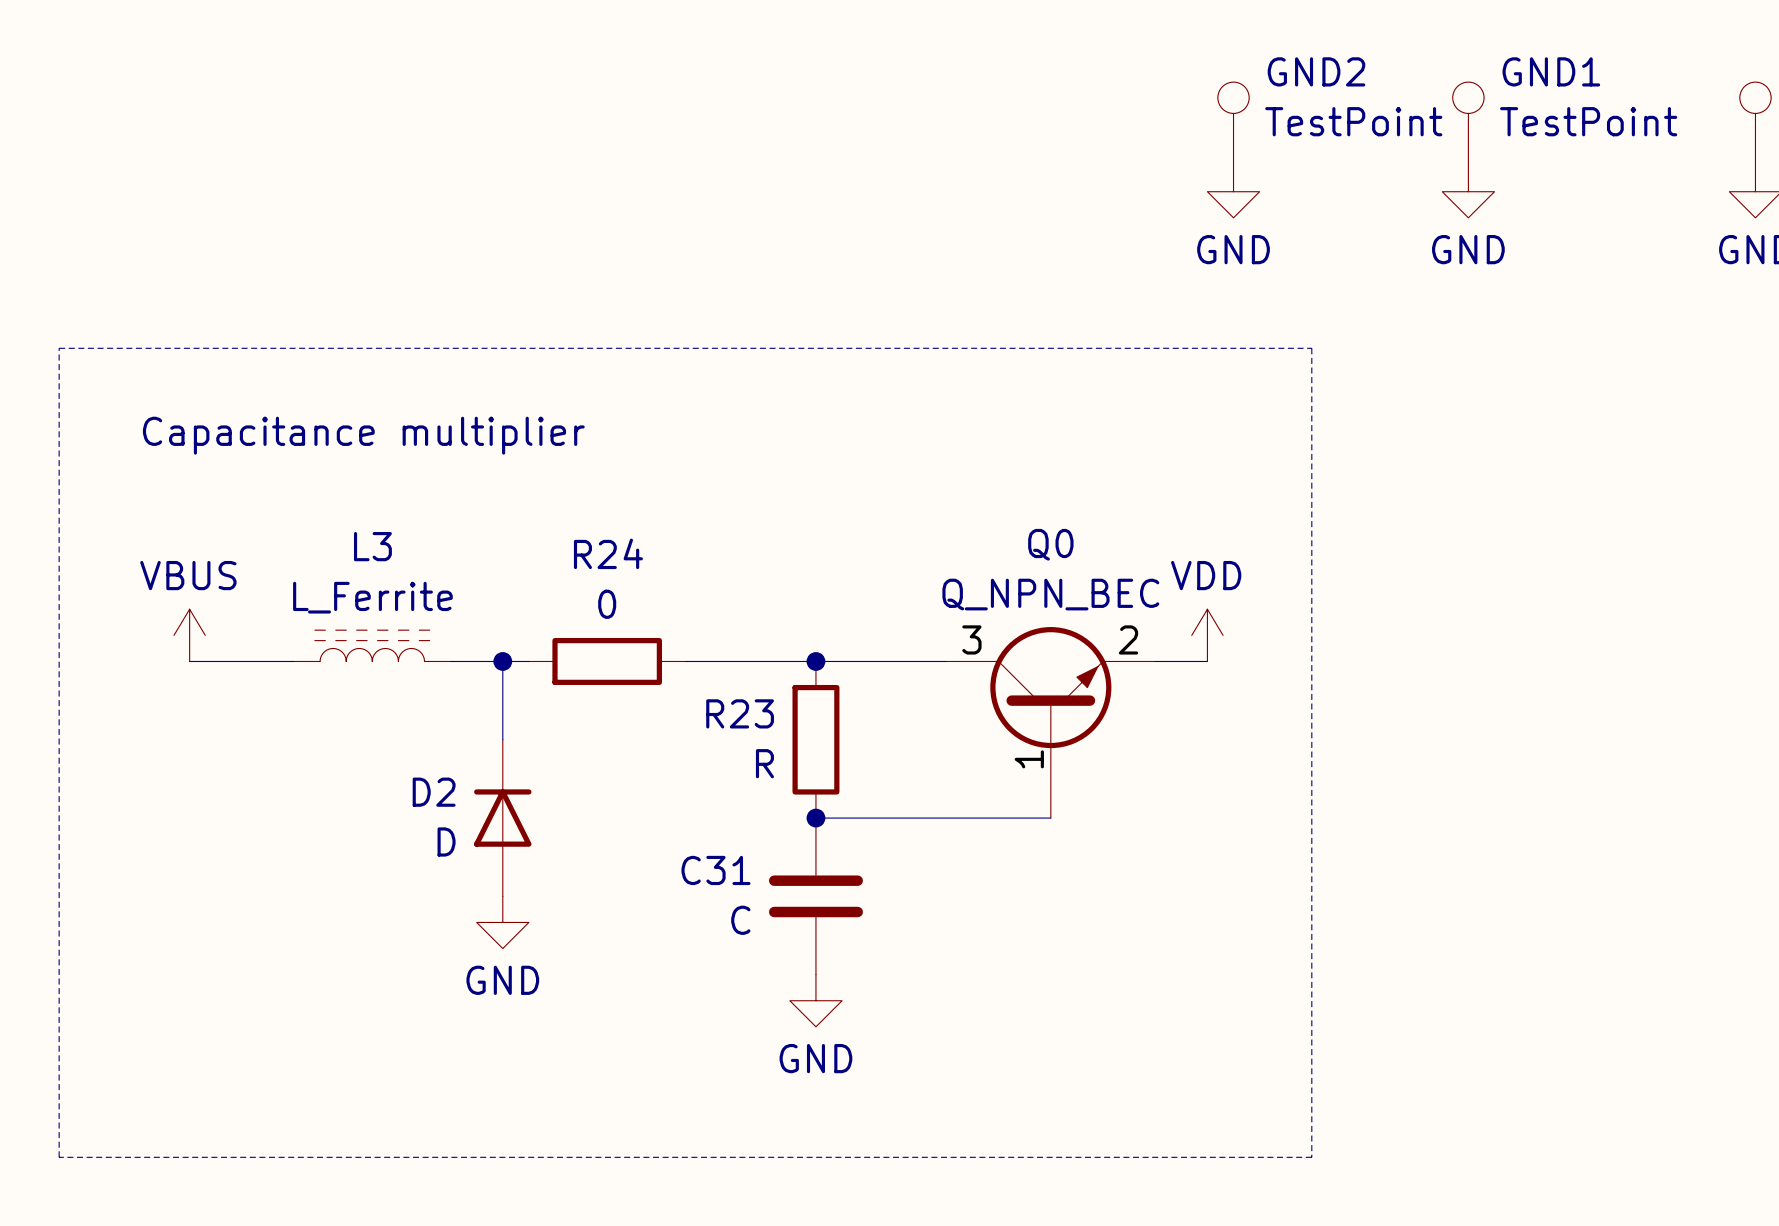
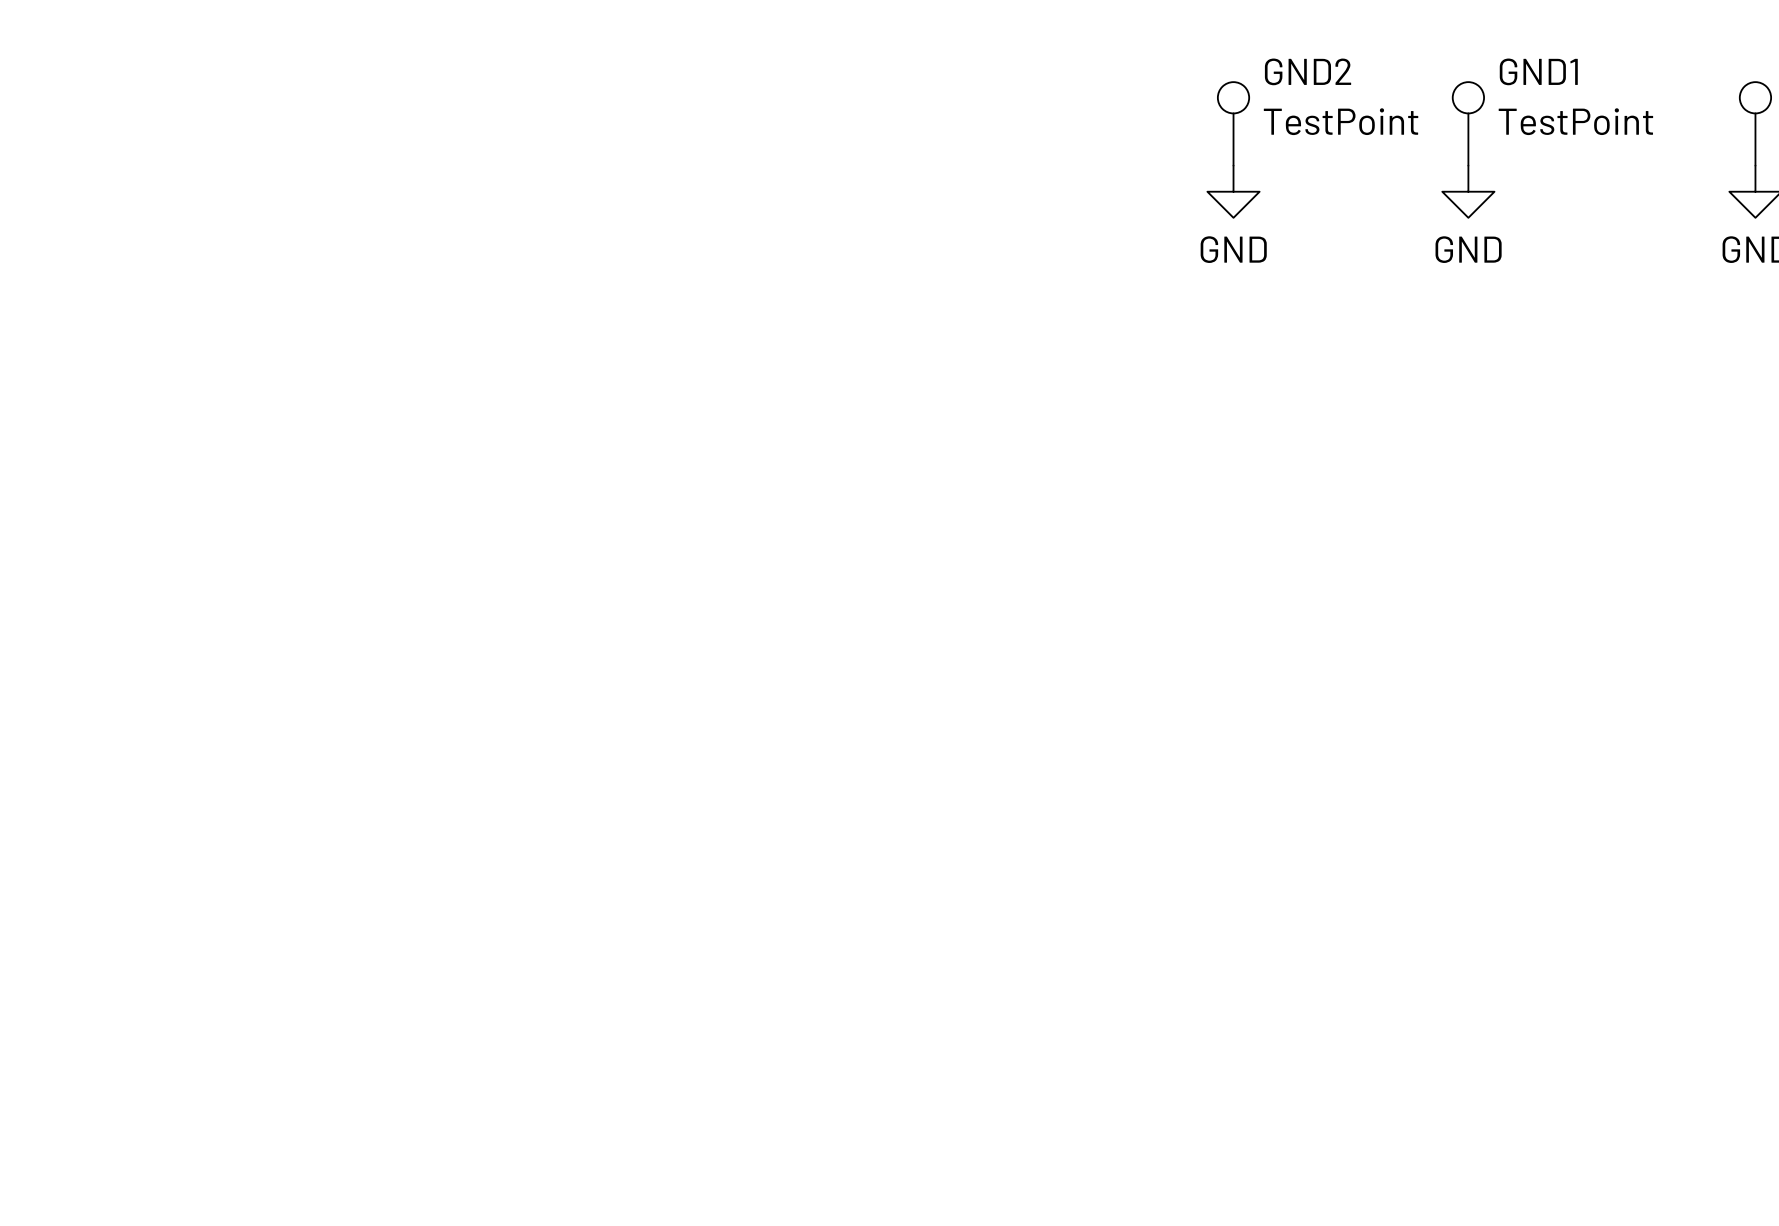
line: (59, 348) (1311, 348) (1311, 1157) (59, 1157) (59, 348) -> none
text: Capacitance multiplier (363, 435) -> none
power symbol: VBUS (189, 635) -> none
power symbol: VDD (1207, 635) -> none
L3: L_Ferrite (372, 645) -> none
wire: (189, 661) (294, 661) -> none
wire: (450, 661) (528, 661) -> none
wire: (502, 661) (502, 739) -> none
junction: (502, 661) -> none
R24: 0 (607, 661) -> none
wire: (685, 661) (946, 661) -> none
junction: (815, 661) -> none
wire: (1155, 661) (1207, 661) -> none
Q0: Q_NPN_BEC (1050, 722) -> none
R23: R (815, 739) -> none
D2: D (502, 818) -> none
wire: (815, 818) (1050, 818) -> none
junction: (815, 818) -> none
C31: C (815, 896) -> none
power symbol: GND (502, 922) -> none
power symbol: GND (815, 1000) -> none

